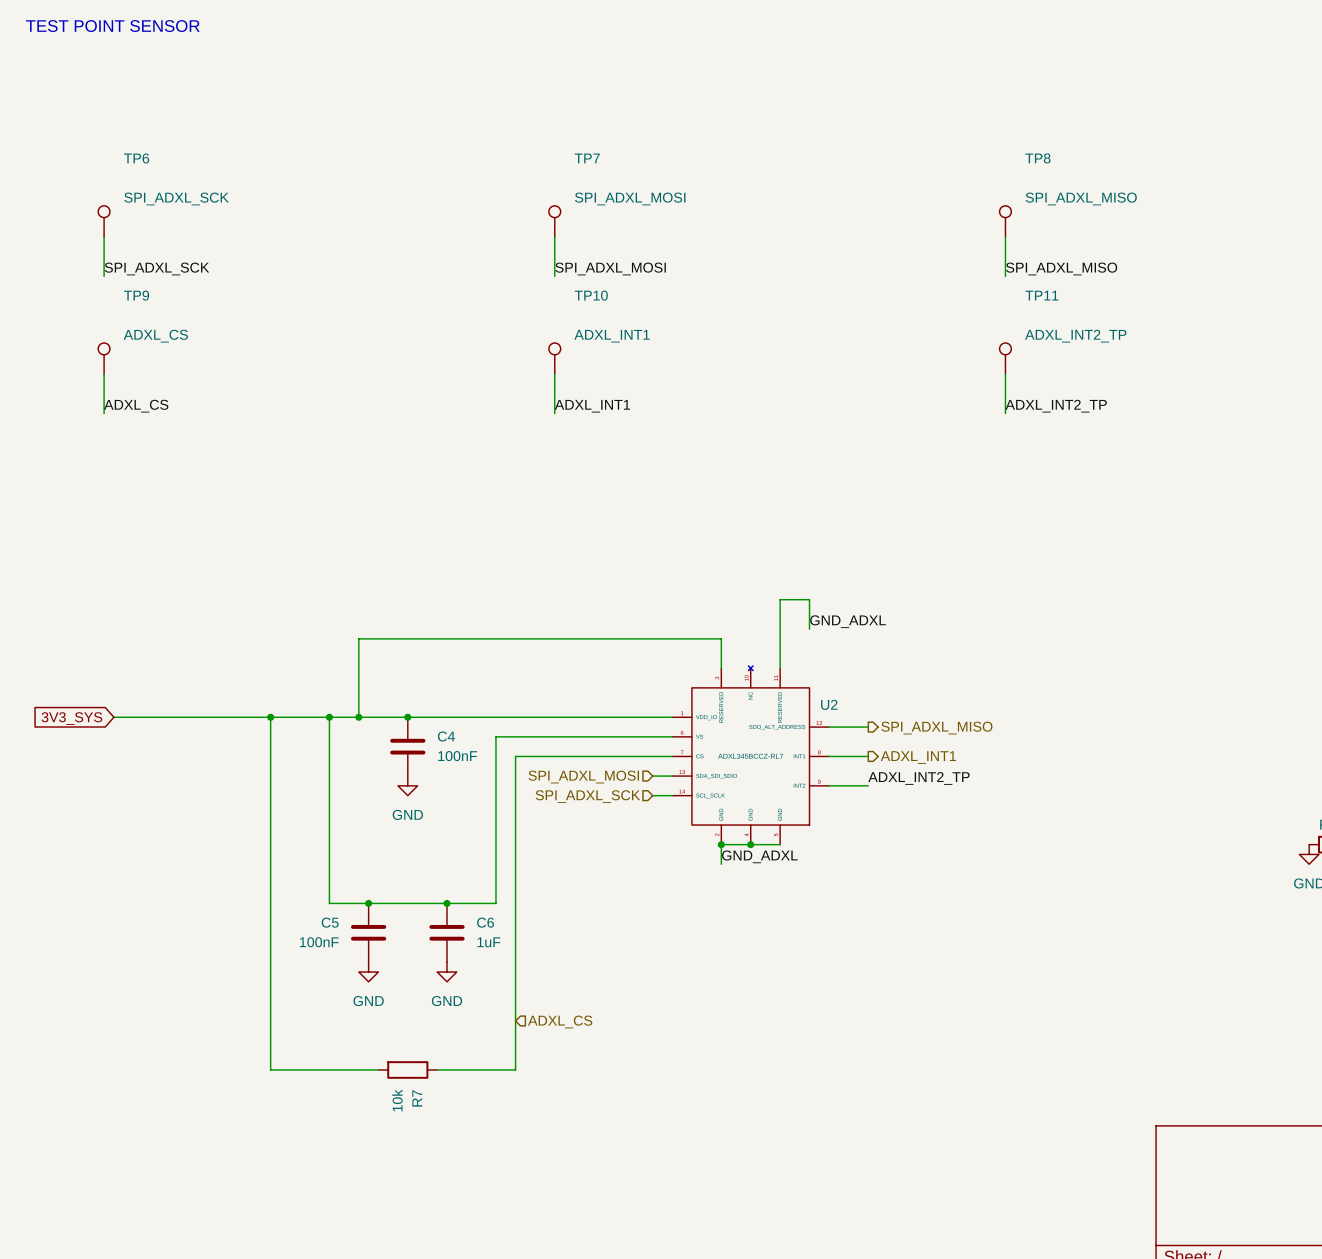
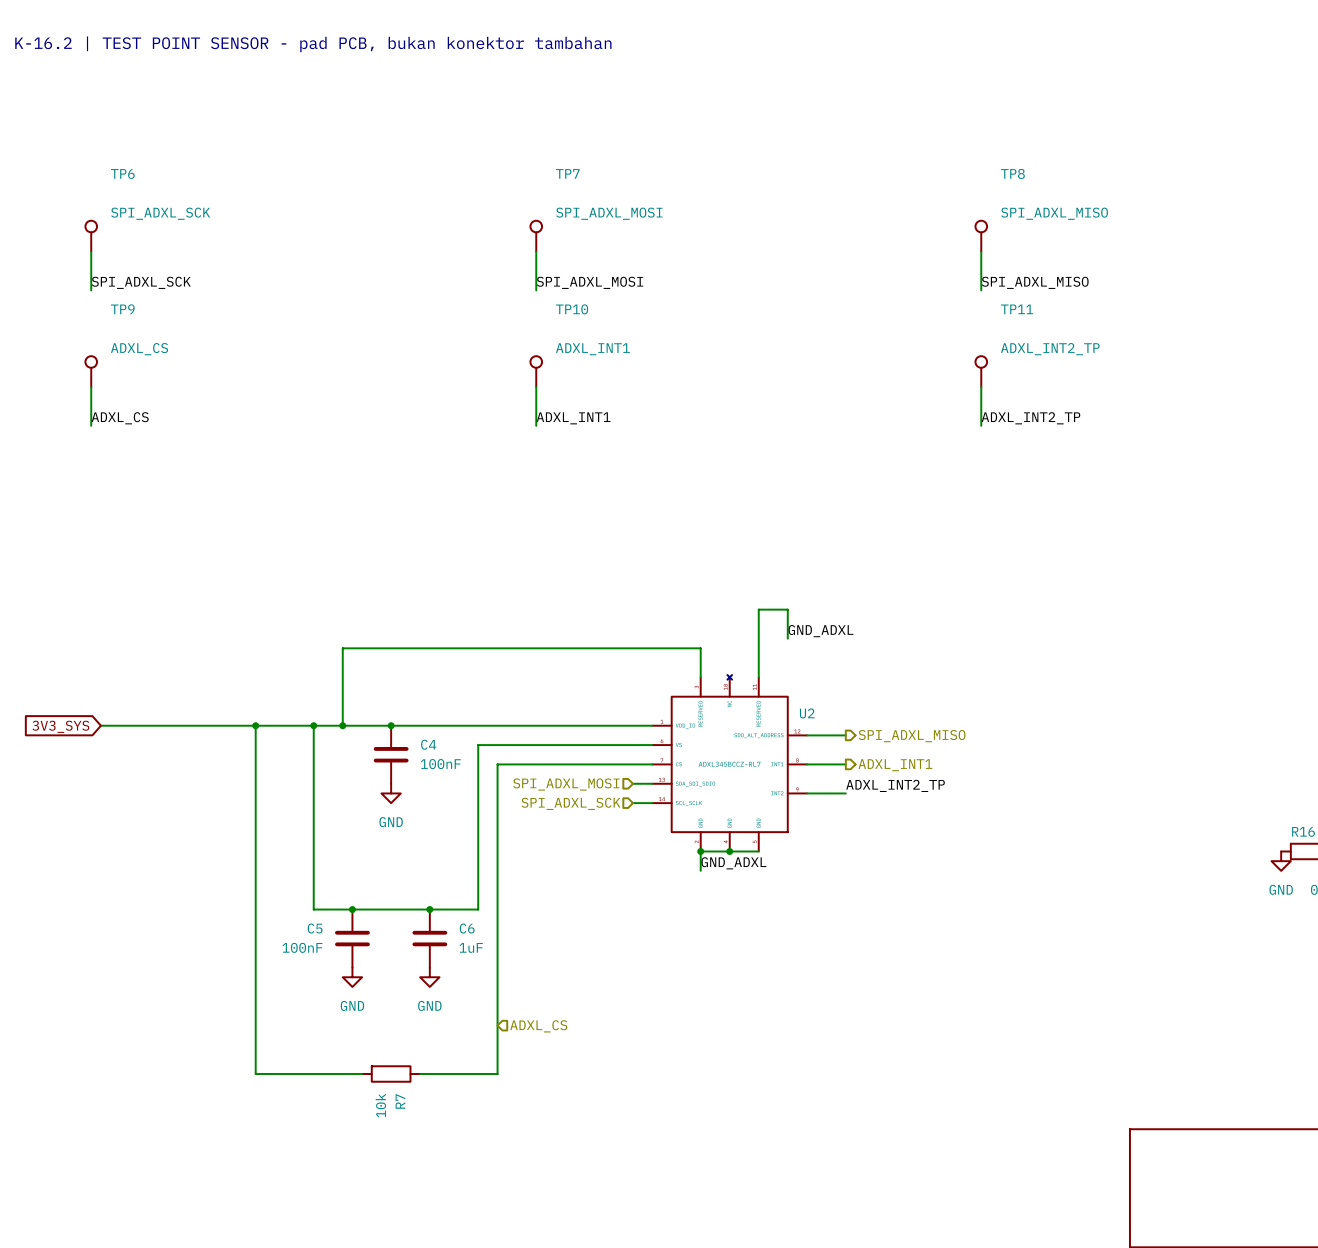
text: TEST POINT SENSOR (112, 26) -> K-16.2 | TEST POINT SENSOR - pad PCB, bukan konektor tambahan (313, 44)

